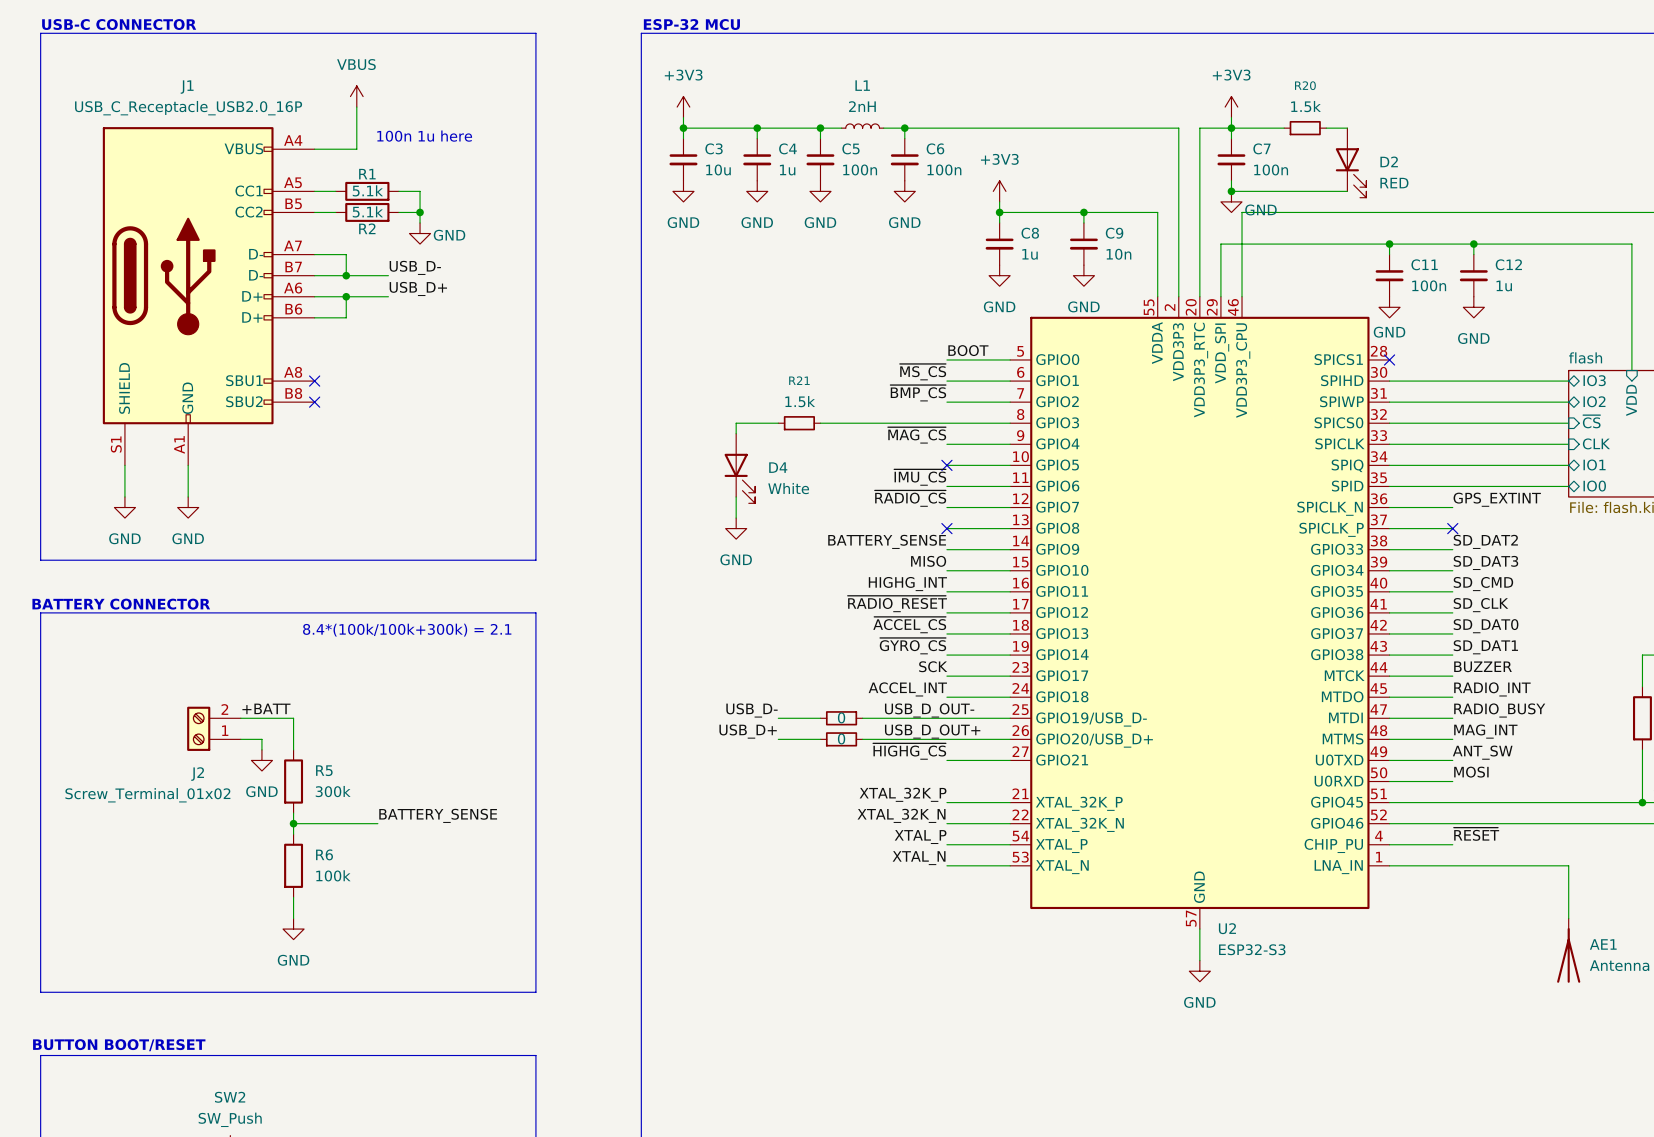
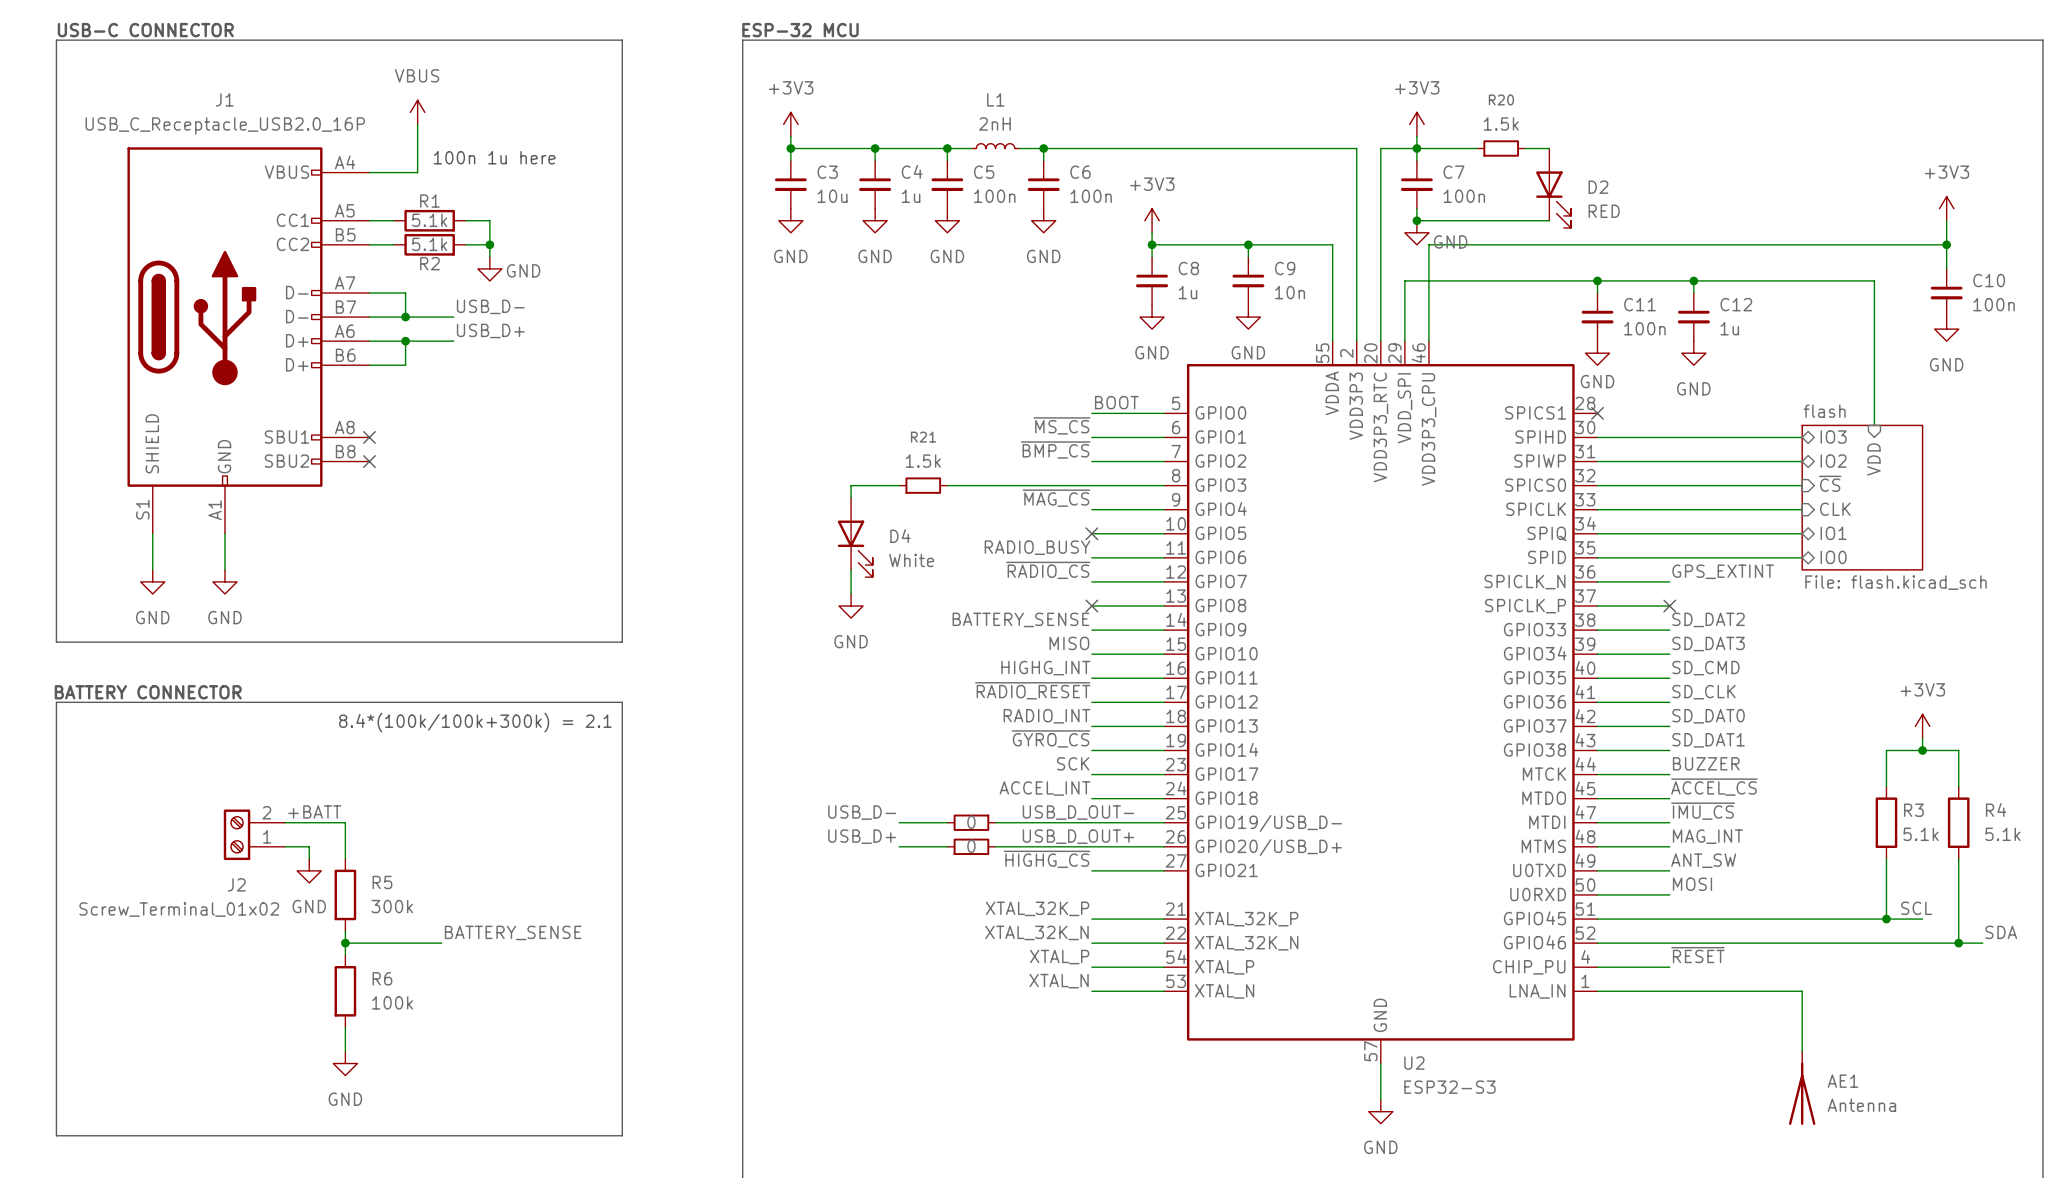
label: ~{IMU_CS} (920, 477) -> RADIO_BUSY (1037, 547)
label: ~{ACCEL_CS} (909, 625) -> RADIO_INT (1047, 716)
label: RADIO_INT (1492, 689) -> ~{ACCEL_CS} (1714, 787)
label: RADIO_BUSY (1499, 710) -> ~{IMU_CS} (1703, 811)

